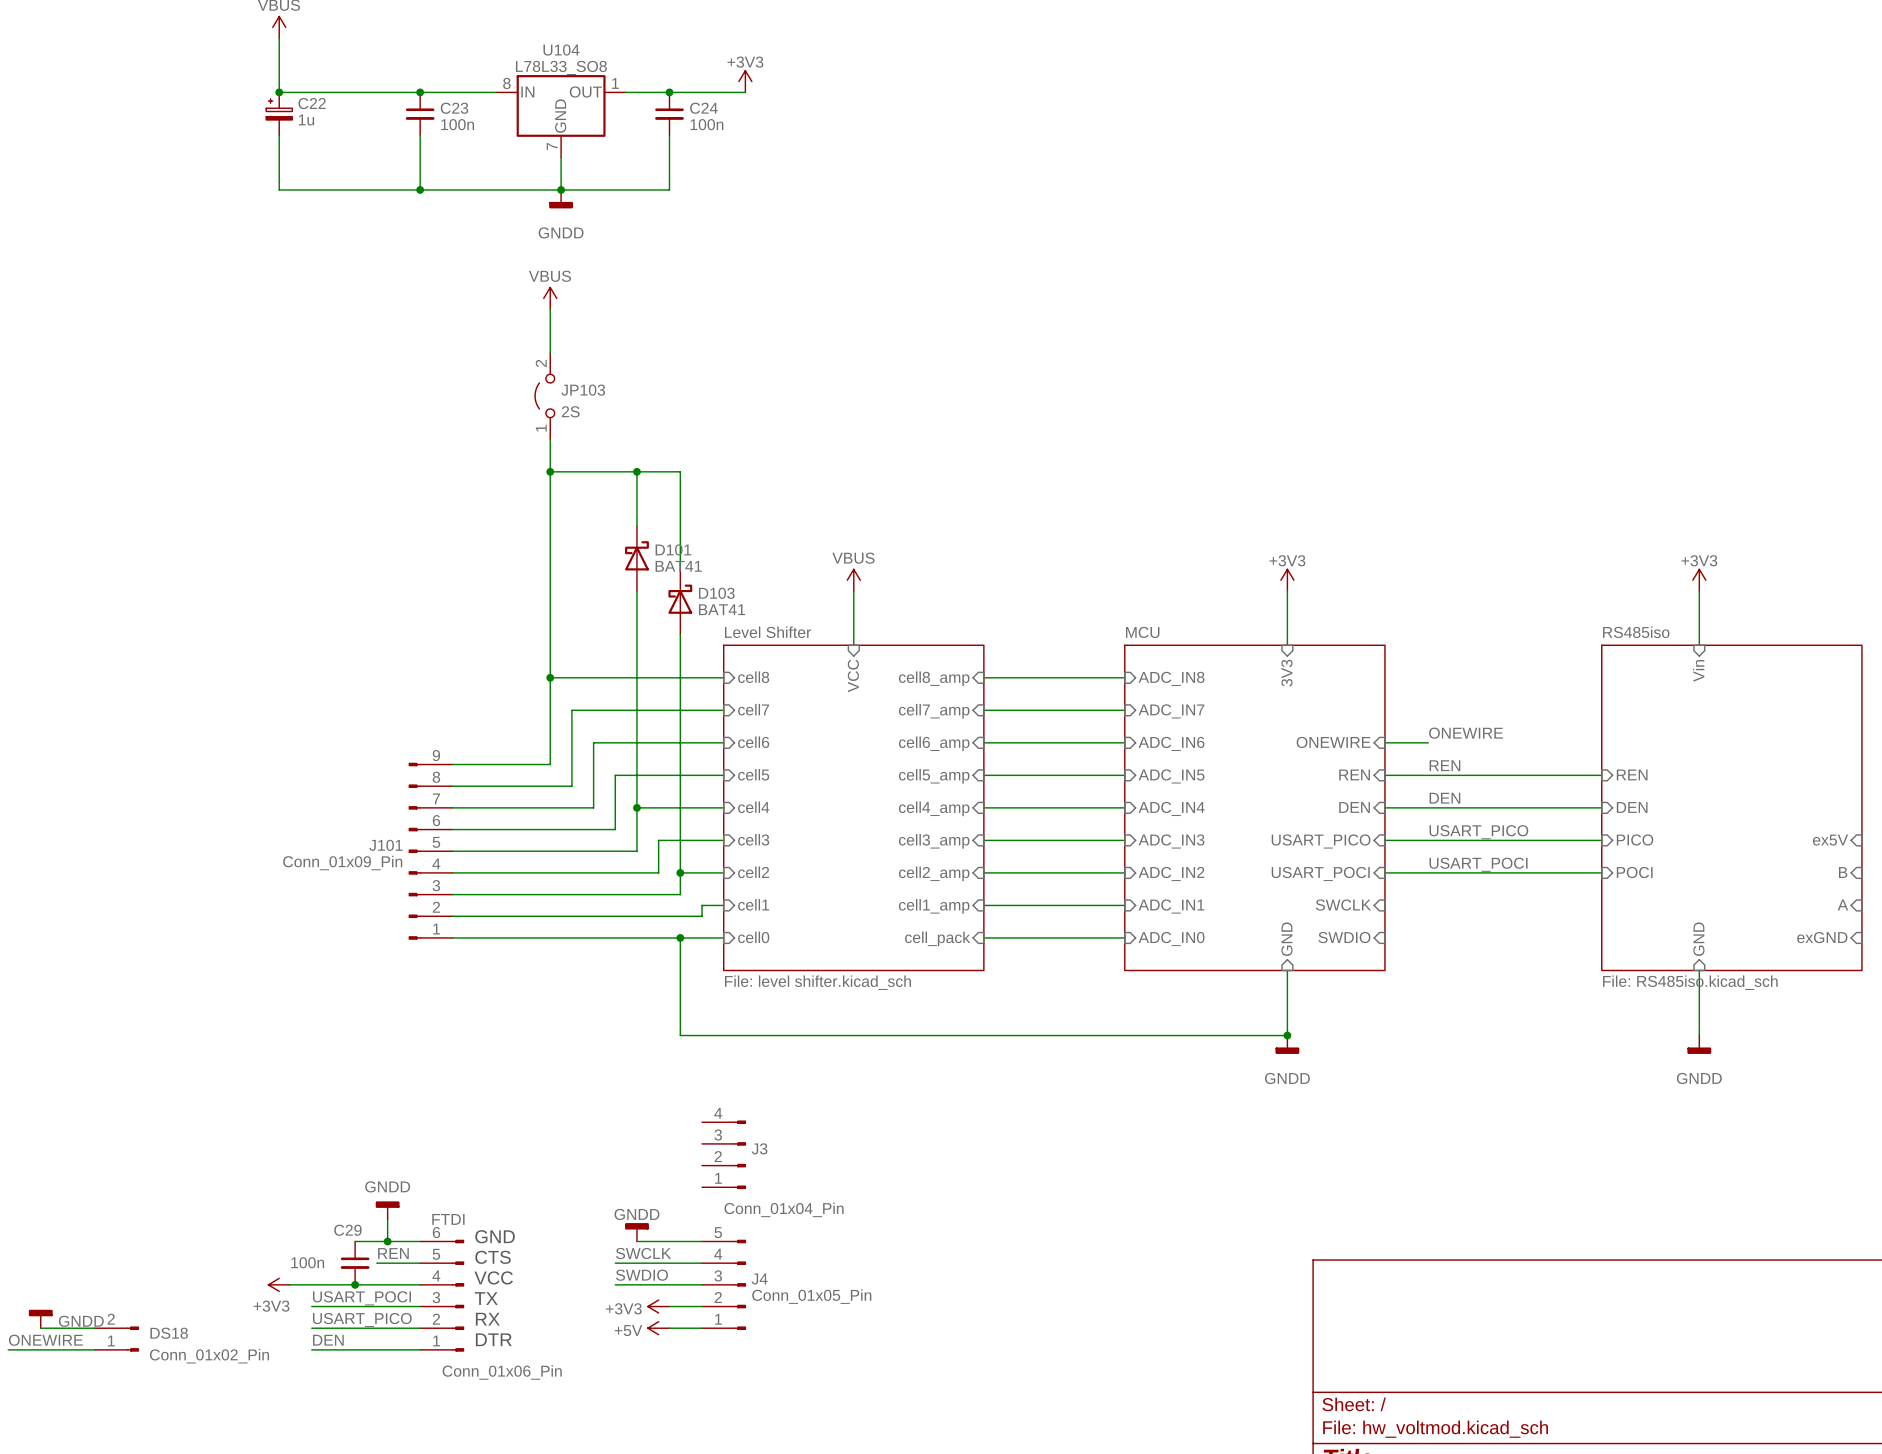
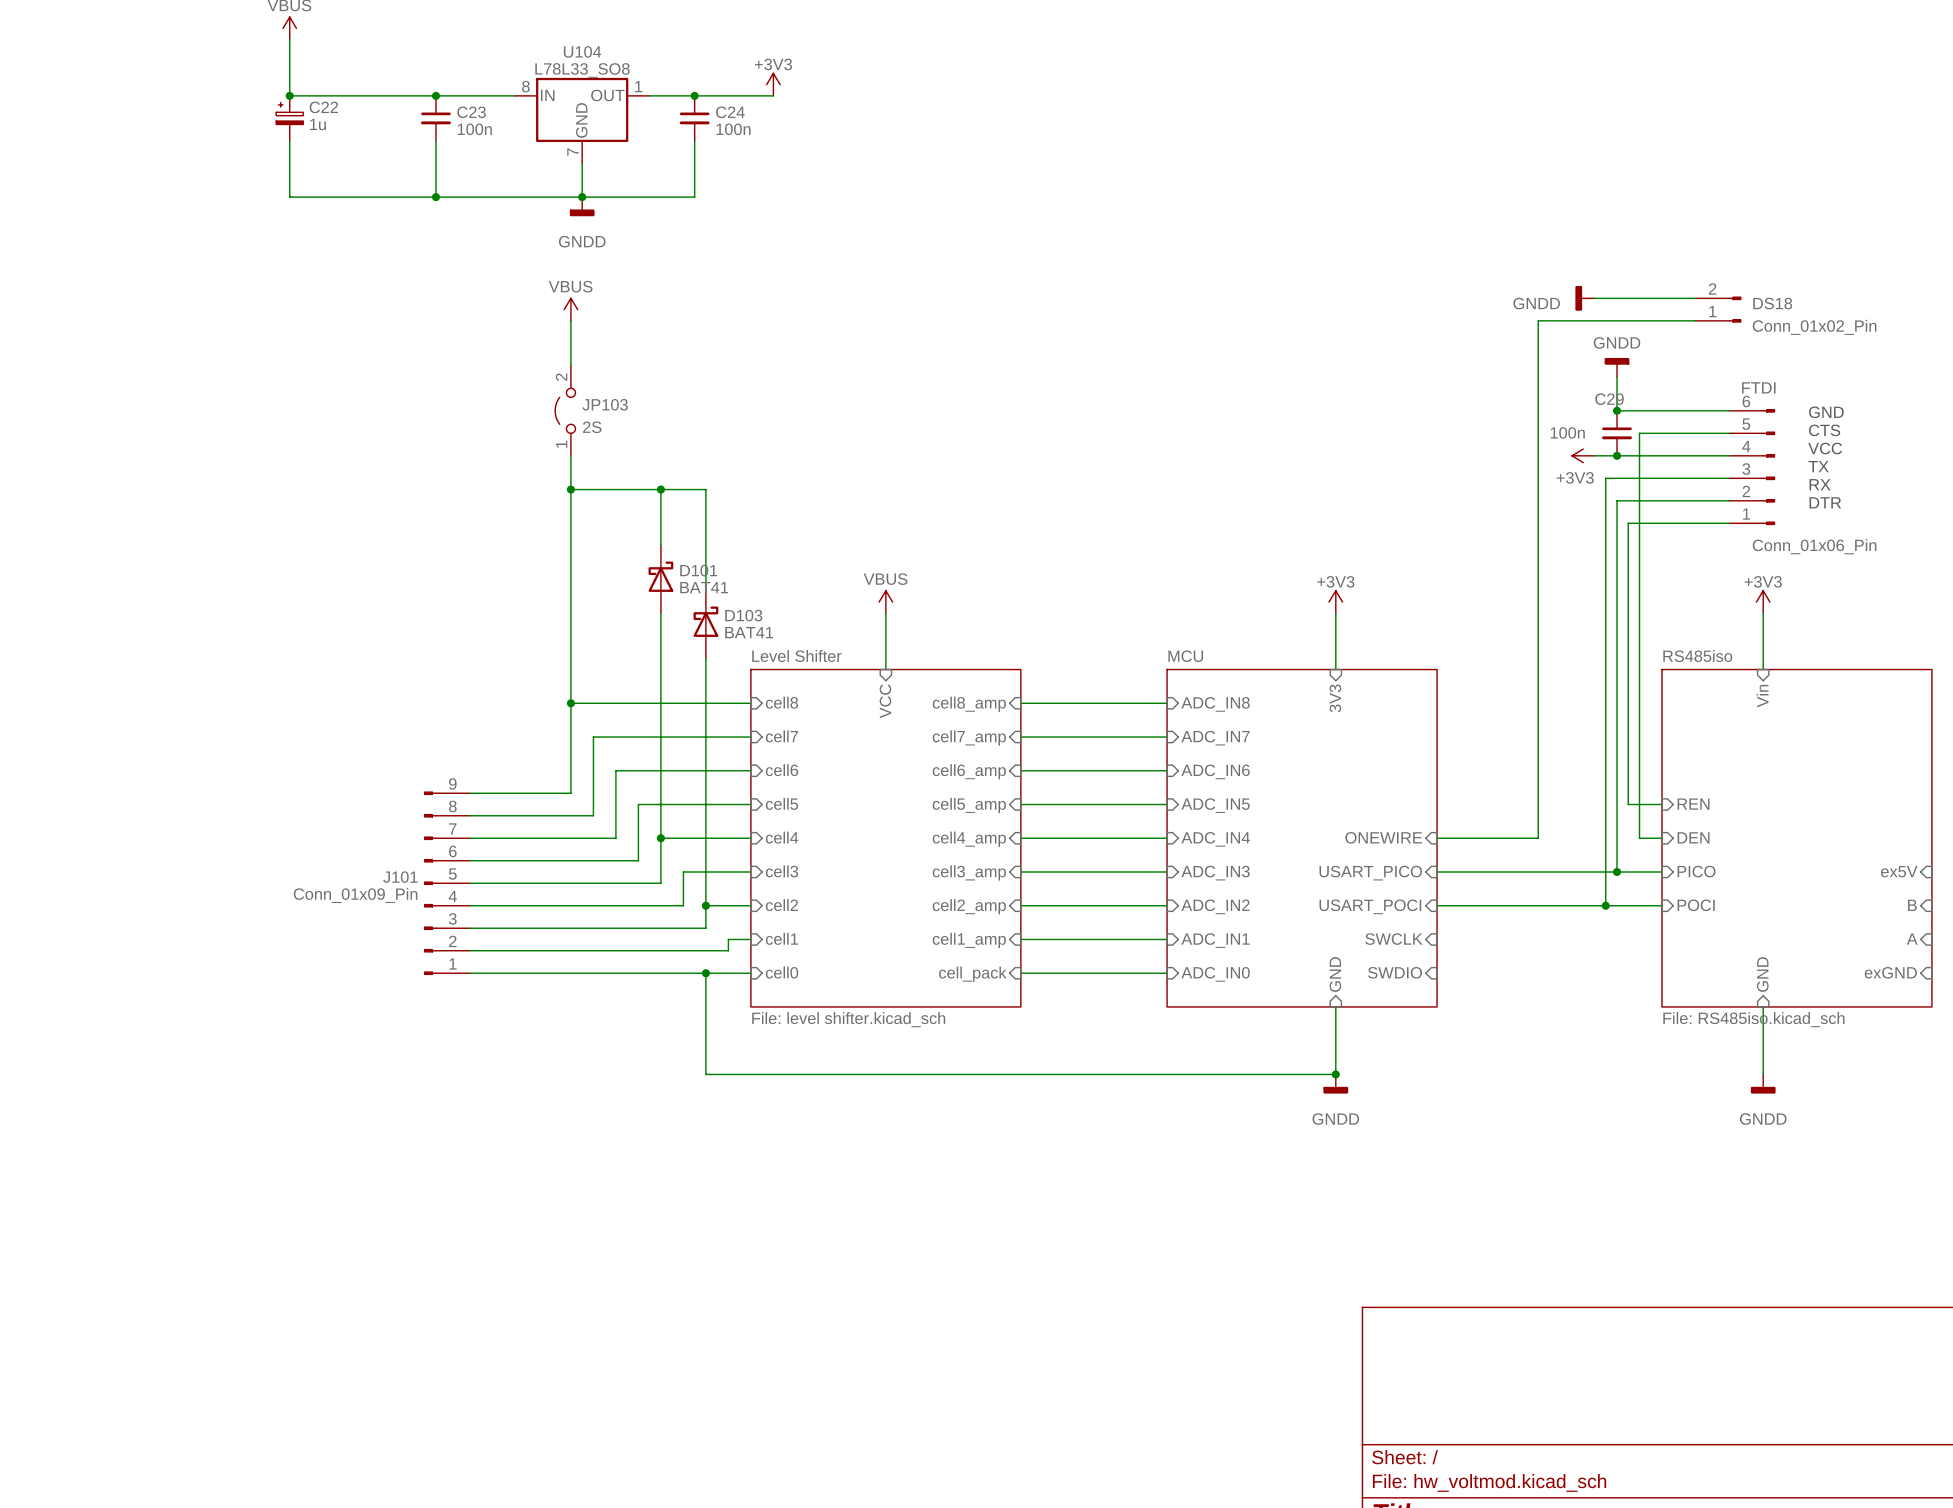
power symbol: none -> GNDD (1584, 298)
wire: none -> (1594, 298) (1695, 298)
wire: none -> (1695, 320) (1538, 320) (1538, 838)
power symbol: none -> GNDD (1617, 367)
wire: none -> (1617, 377) (1617, 410) (1729, 410)
junction: none -> (1617, 410)
text: none -> GND (1826, 412)
text: none -> CTS (1824, 430)
text: none -> VCC (1825, 448)
power symbol: none -> +3V3 (1583, 455)
wire: none -> (1594, 455) (1729, 455)
junction: none -> (1617, 455)
text: none -> TX (1818, 466)
FTDI: none -> Conn_01x06_Pin (1752, 467)
wire: none -> (1729, 478) (1605, 478) (1605, 905)
text: none -> RX (1820, 484)
wire: none -> (1729, 500) (1617, 500) (1617, 871)
text: none -> DTR (1825, 502)
label: ONEWIRE (1466, 733) -> none
sheet pin: ONEWIRE (1333, 742) -> none
wire: (1384, 742) (1428, 742) -> none
label: REN (1444, 765) -> none
sheet pin: REN (1354, 774) -> none
wire: (1384, 775) (1569, 775) -> (1729, 523) (1628, 523) (1628, 804)
label: DEN (1444, 798) -> none
sheet pin: DEN (1354, 807) -> ONEWIRE (1383, 837)
wire: (1482, 807) (1580, 807) -> (1729, 433) (1639, 433) (1639, 838)
label: USART_PICO (1478, 832) -> none
junction: none -> (1617, 871)
label: USART_POCI (1478, 864) -> none
junction: none -> (1605, 905)
J3: Conn_01x04_Pin (724, 1154) -> none
power symbol: GNDD (387, 1210) -> none
wire: (387, 1219) (387, 1241) -> none
power symbol: GNDD (636, 1232) -> none
text: GND (495, 1236) -> none
wire: (355, 1241) (420, 1241) -> none
junction: (387, 1241) -> none
wire: (636, 1241) (702, 1241) -> none
label: REN (393, 1253) -> none
label: SWCLK (643, 1253) -> none
text: CTS (493, 1257) -> none
C29 position: (355, 1263) -> (1617, 433)
wire: (376, 1263) (420, 1263) -> none
wire: (615, 1263) (702, 1263) -> none
label: SWDIO (641, 1275) -> none
text: VCC (493, 1277) -> none
power symbol: +3V3 (279, 1284) -> none
wire: (290, 1284) (420, 1284) -> none
junction: (355, 1284) -> none
wire: (615, 1284) (702, 1284) -> none
J4: Conn_01x05_Pin (724, 1284) -> none
FTDI: Conn_01x06_Pin (442, 1295) -> none
label: USART_POCI (361, 1298) -> none
text: TX (486, 1298) -> none
wire: (311, 1306) (420, 1306) -> none
power symbol: +3V3 (658, 1306) -> none
wire: (669, 1306) (702, 1306) -> none
power symbol: GNDD (40, 1319) -> none
text: RX (487, 1319) -> none
label: USART_PICO (362, 1320) -> none
wire: (40, 1328) (94, 1328) -> none
wire: (311, 1328) (420, 1328) -> none
power symbol: +5V (658, 1328) -> none
wire: (669, 1328) (702, 1328) -> none
DS18 position: (116, 1339) -> (1718, 309)
text: DTR (493, 1339) -> none
label: ONEWIRE (45, 1340) -> none
label: DEN (328, 1340) -> none
wire: (8, 1349) (94, 1349) -> none
wire: (311, 1349) (420, 1349) -> none

